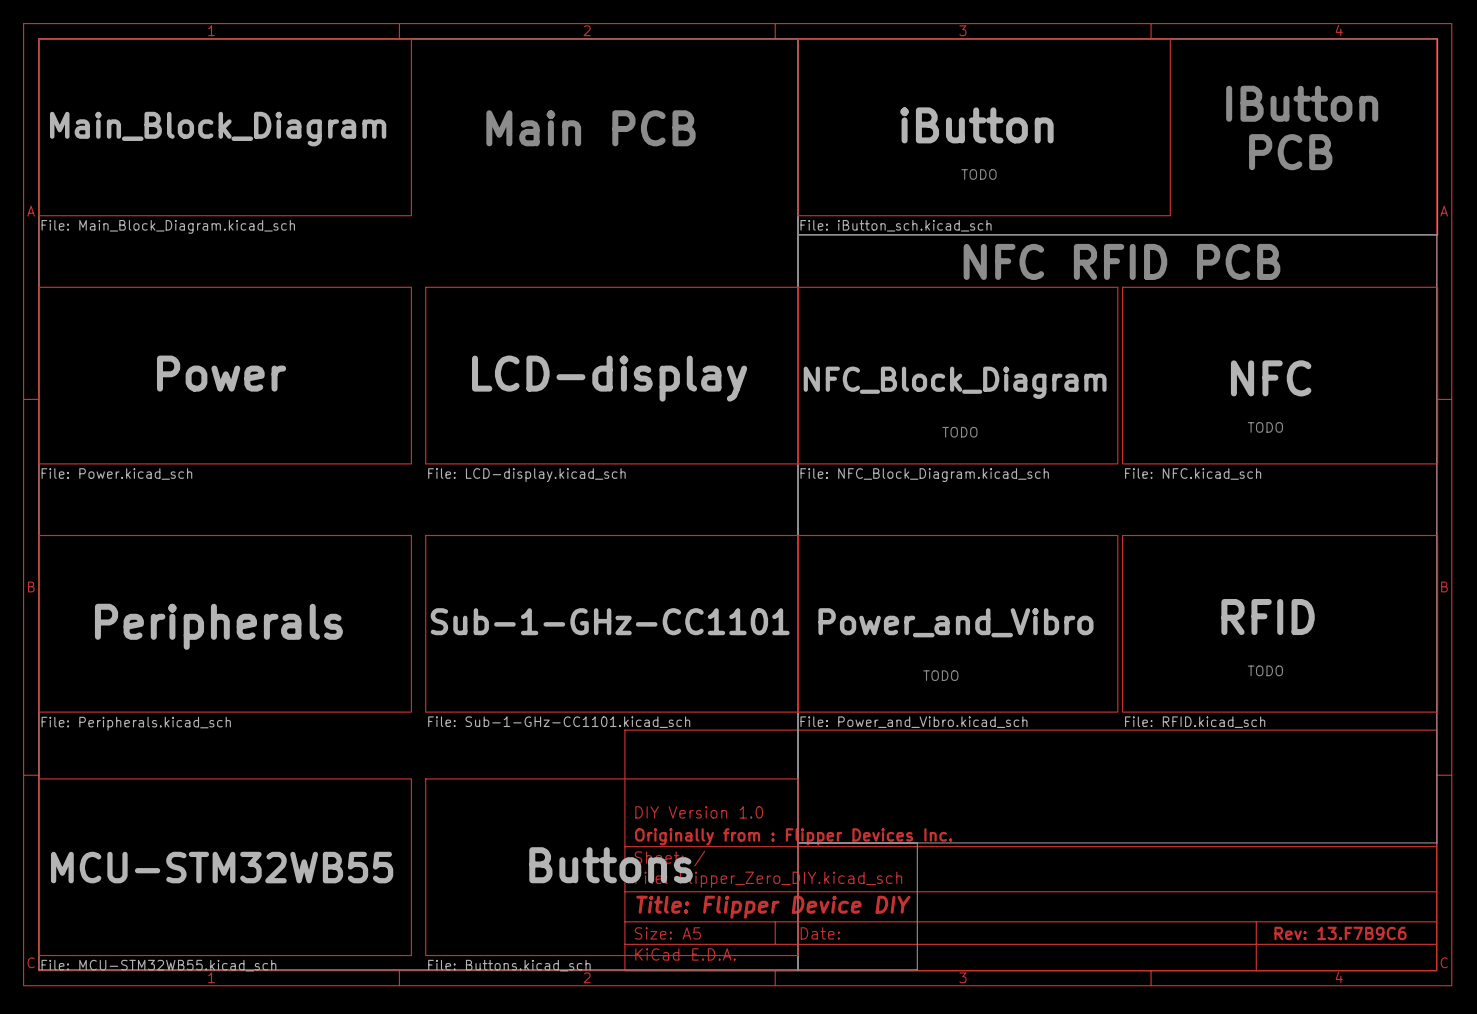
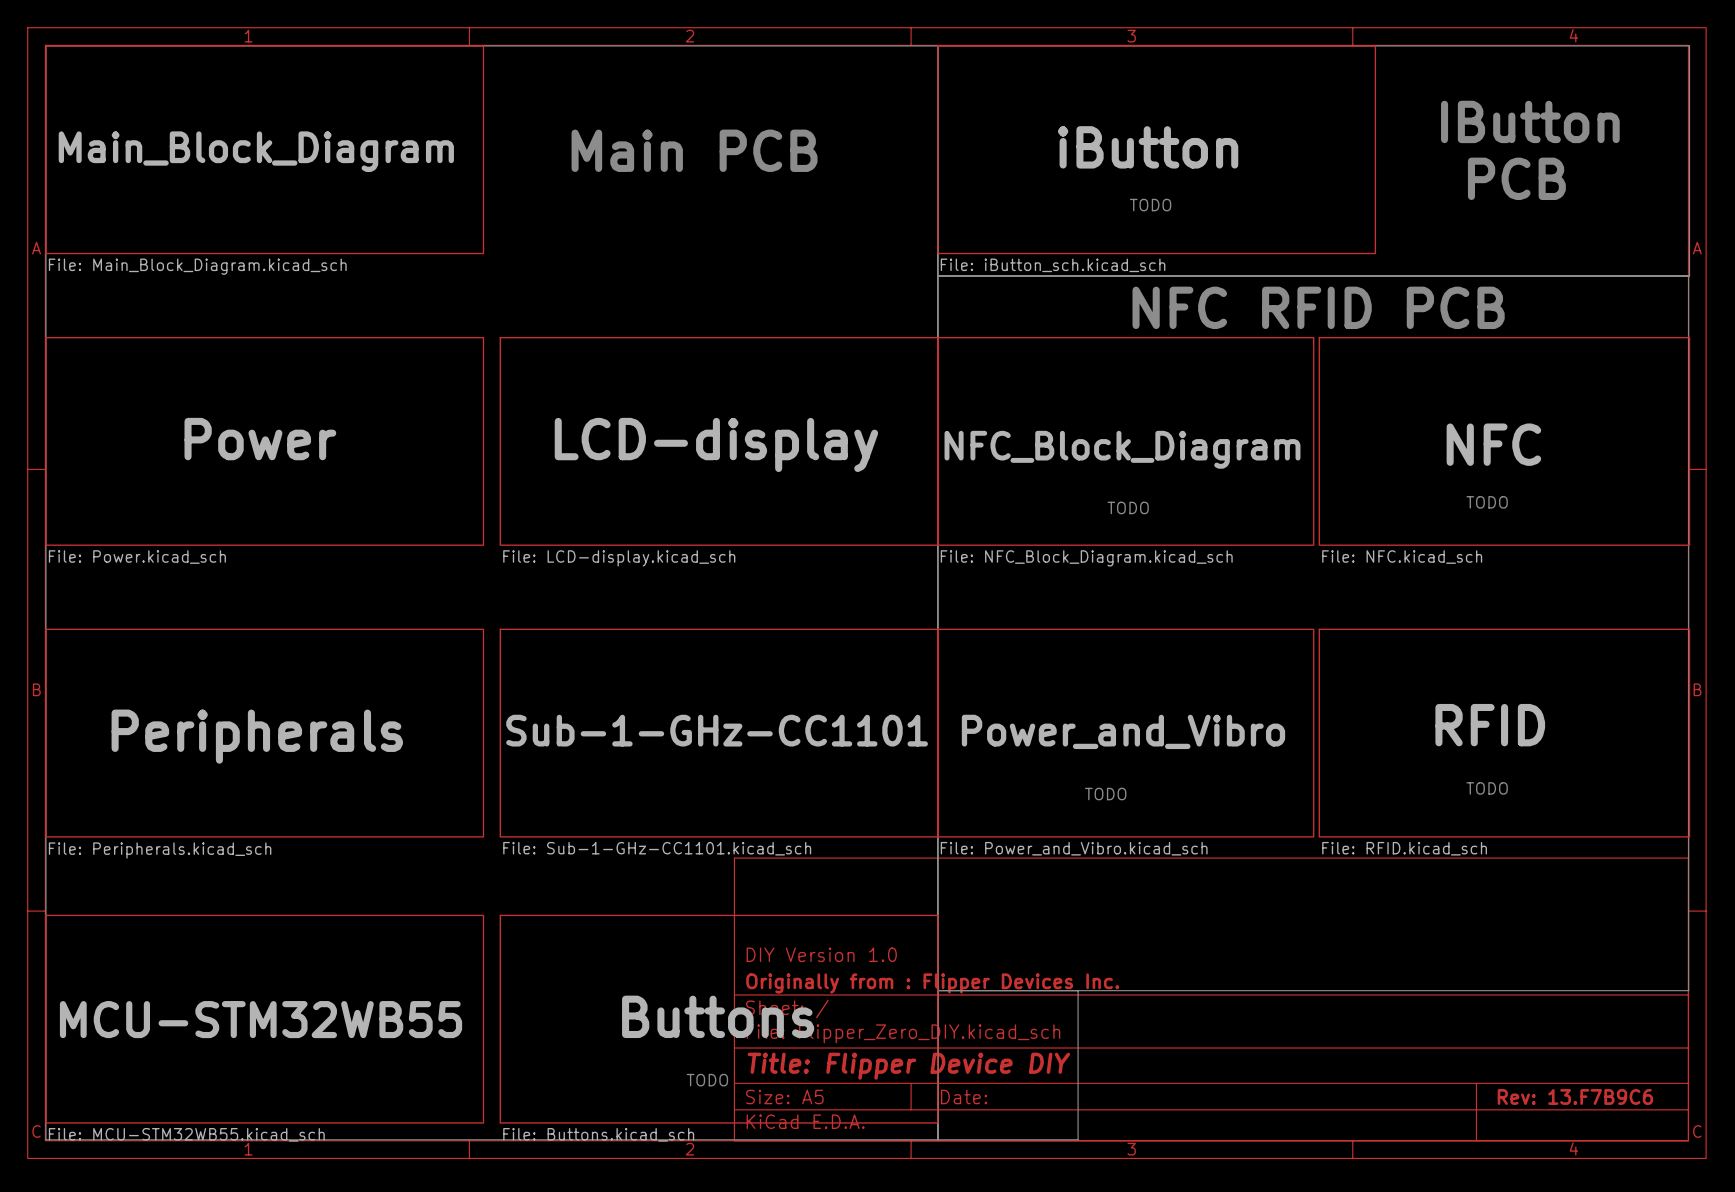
text: none -> TODO (707, 1080)

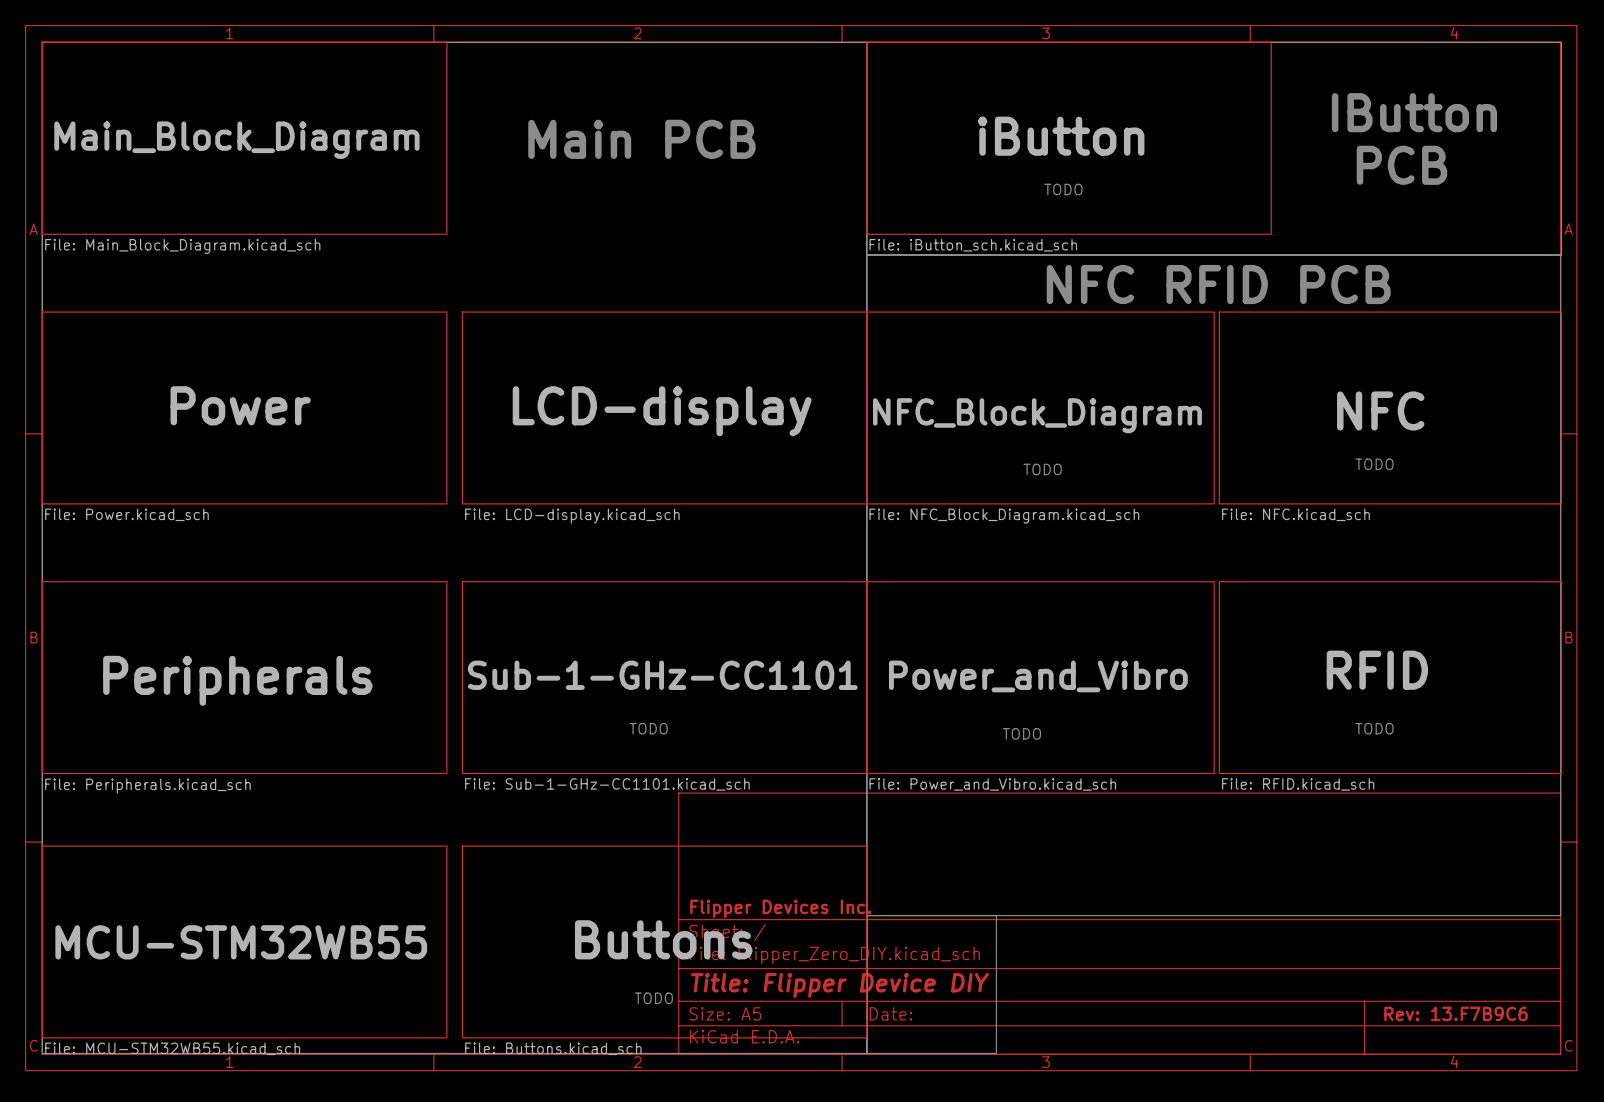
text: none -> TODO (648, 728)
title block: DIY Version 1.0 (821, 954) -> none
title block: Originally from : Flipper Devices Inc. (932, 983) -> Flipper Devices Inc. (780, 908)

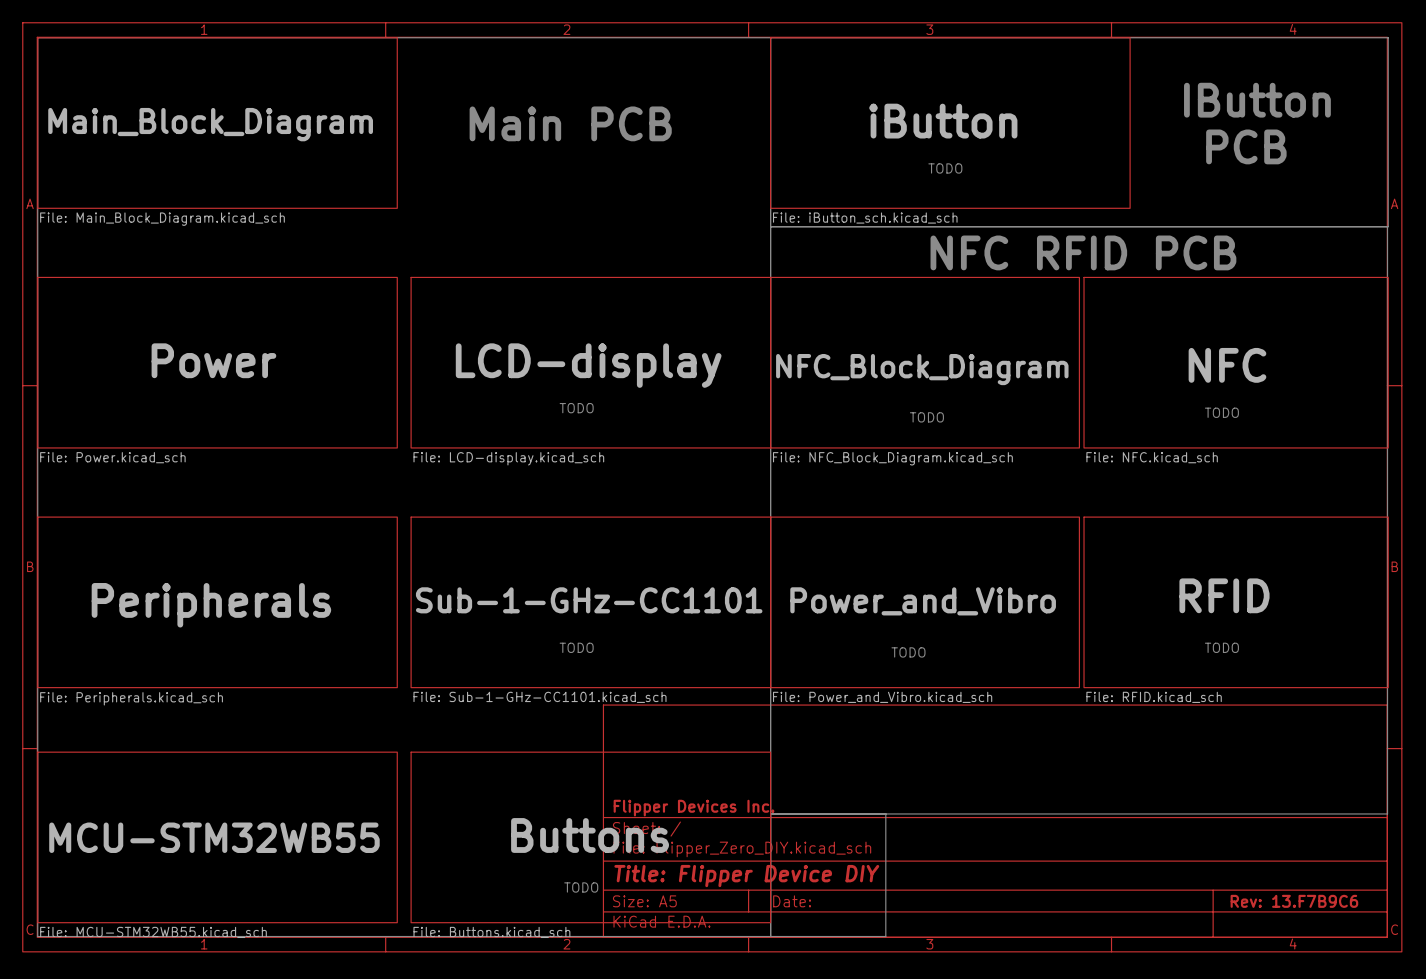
text: none -> TODO (576, 408)

